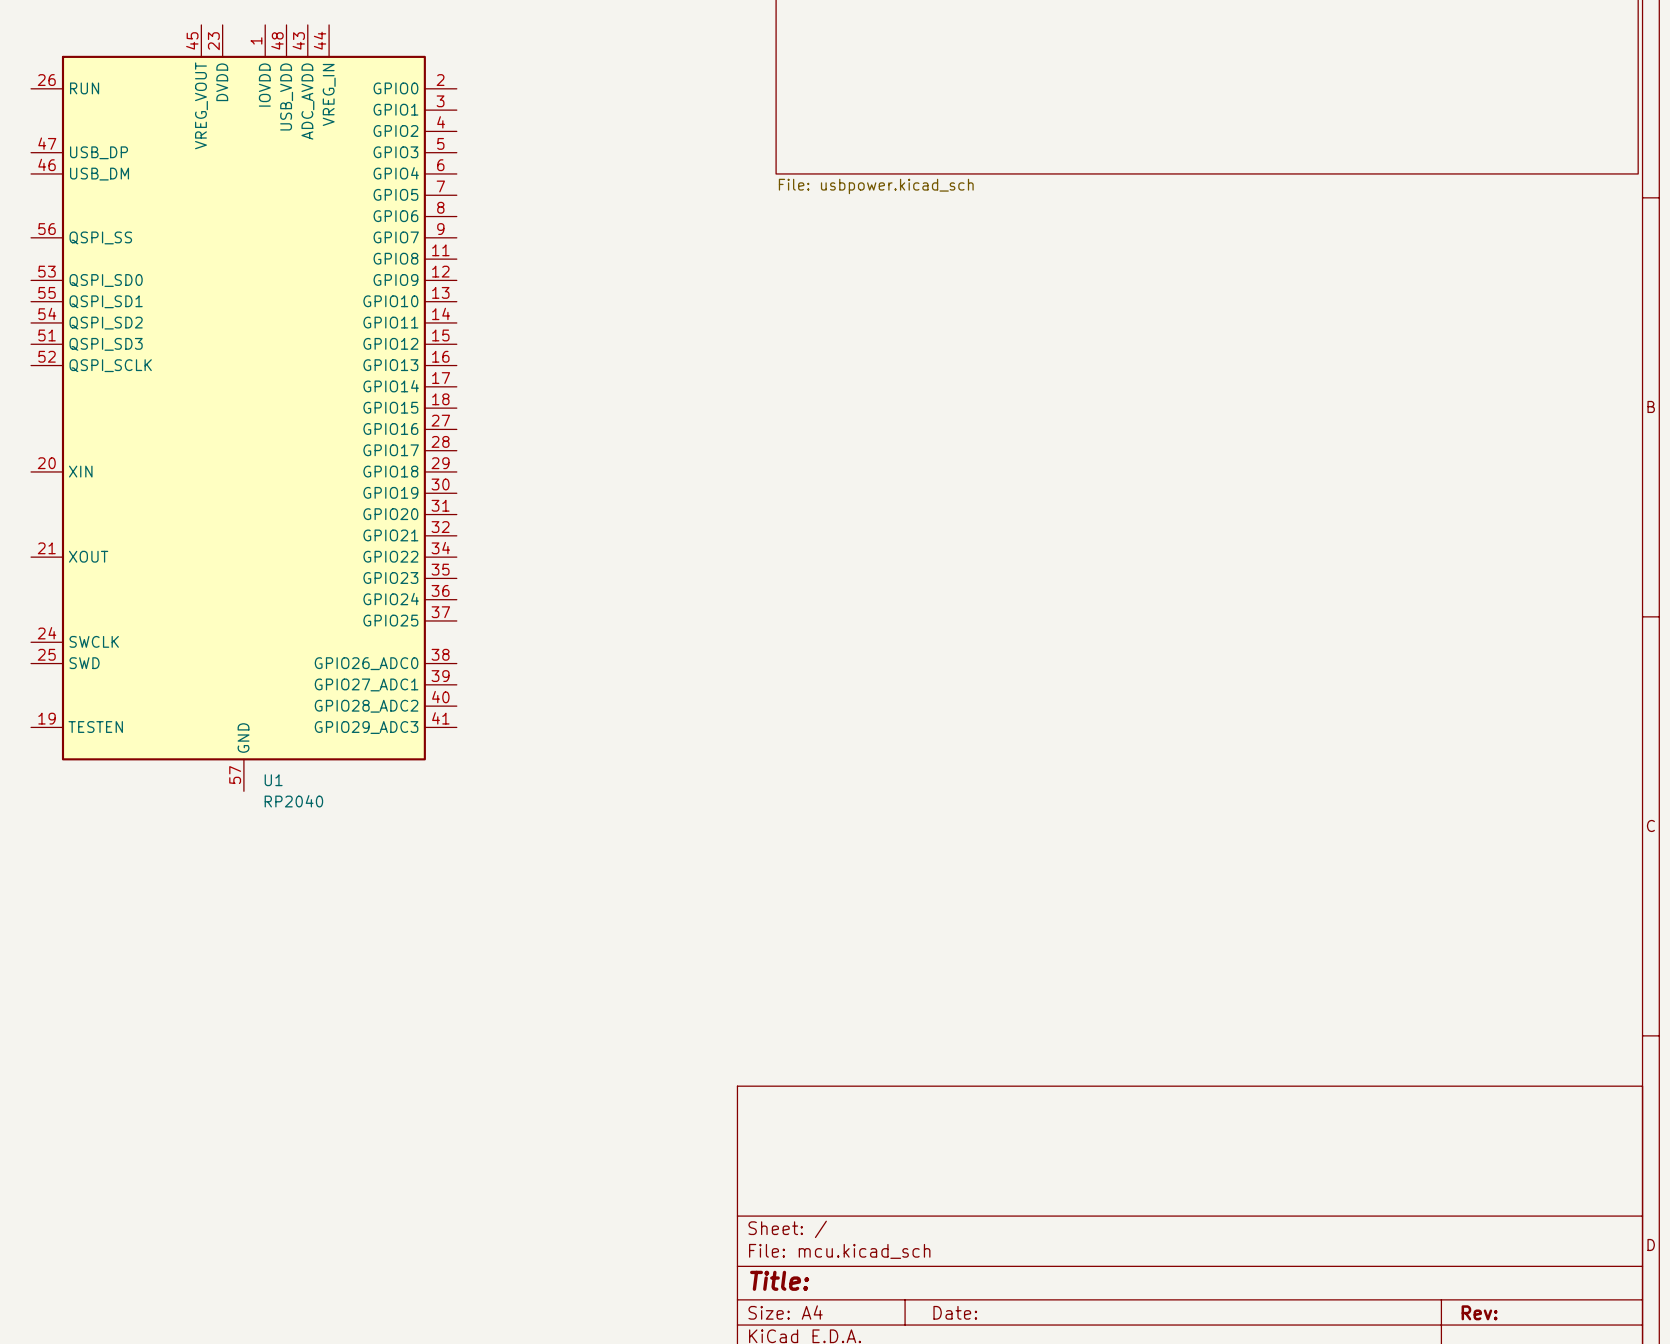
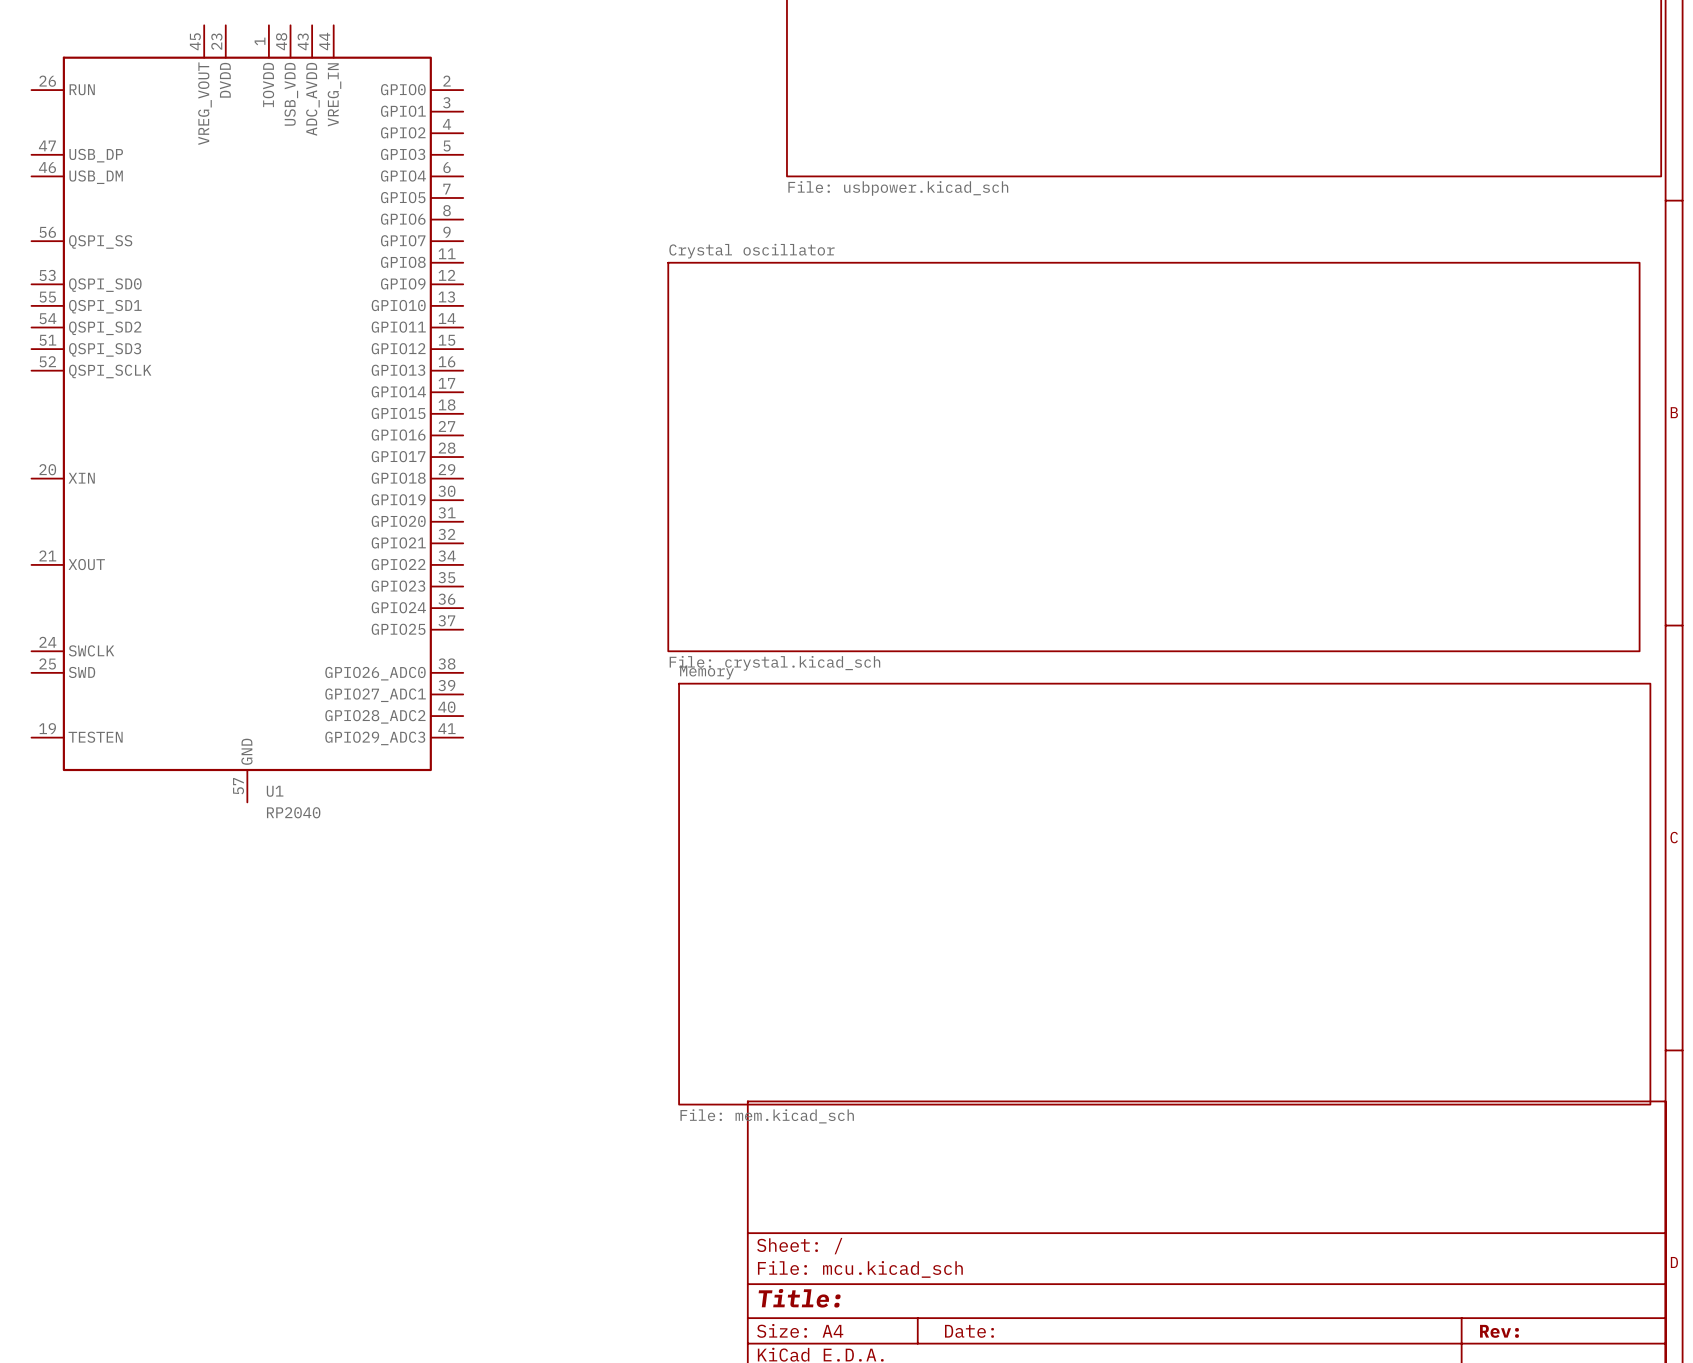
sheet Crystal oscillator: none -> File: crystal.kicad_sch (1153, 457)
sheet Memory: none -> File: mem.kicad_sch (1164, 894)

